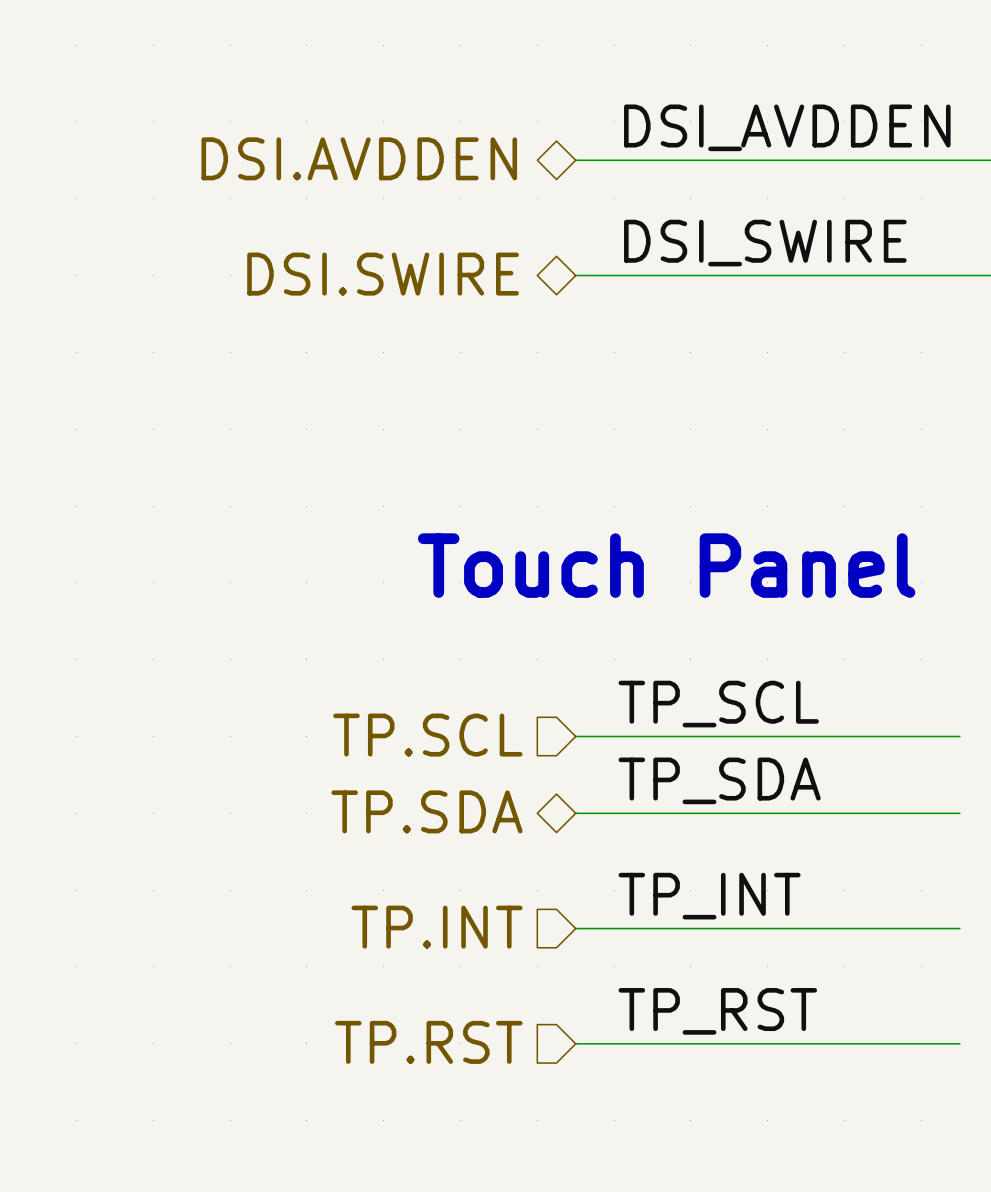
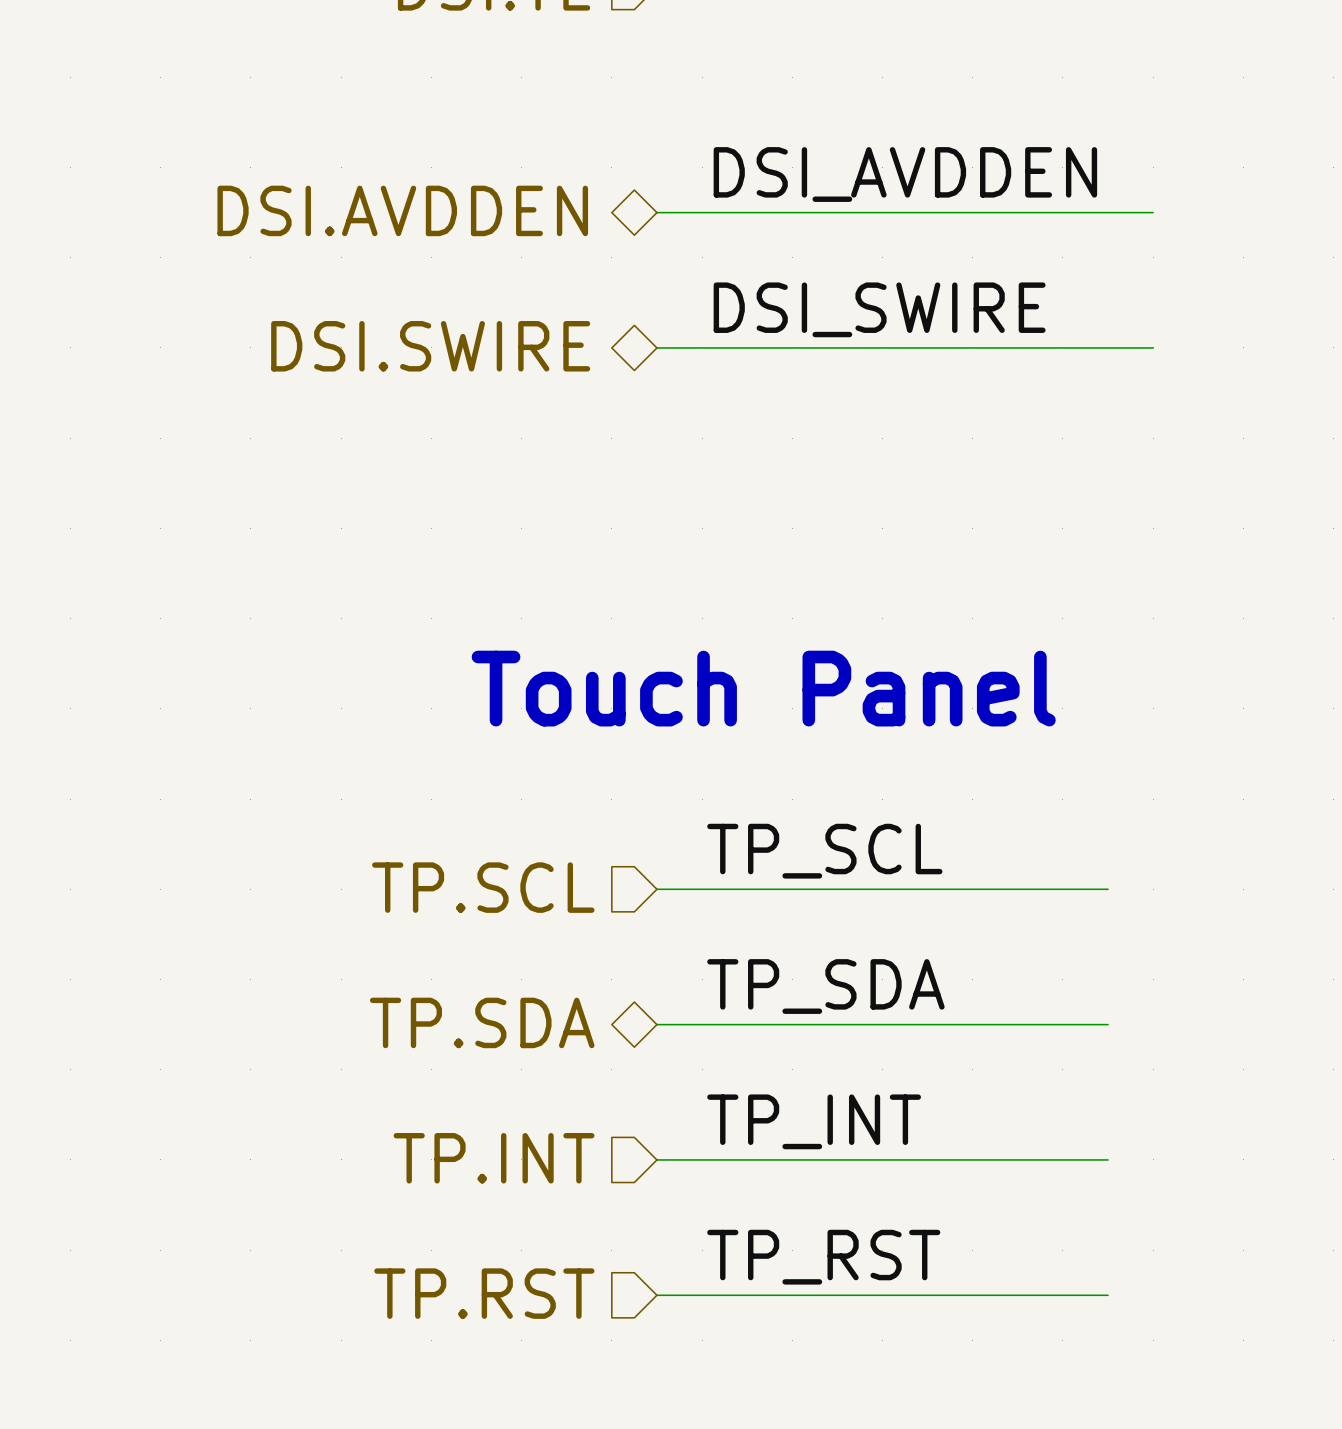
label position: TP_SDA (719, 780) -> TP_SDA (825, 986)
hierarchical label position: TP.SDA (426, 811) -> TP.SDA (482, 1022)
wire: (575, 813) (959, 813) -> (656, 1024) (1108, 1024)
label position: TP_INT (709, 896) -> TP_INT (814, 1121)
hierarchical label position: TP.INT (437, 927) -> TP.INT (494, 1158)
wire: (575, 928) (959, 928) -> (656, 1159) (1108, 1159)
label position: TP_RST (717, 1011) -> TP_RST (823, 1257)
hierarchical label position: TP.RST (428, 1042) -> TP.RST (484, 1293)
wire: (575, 1043) (959, 1043) -> (656, 1295) (1108, 1295)

